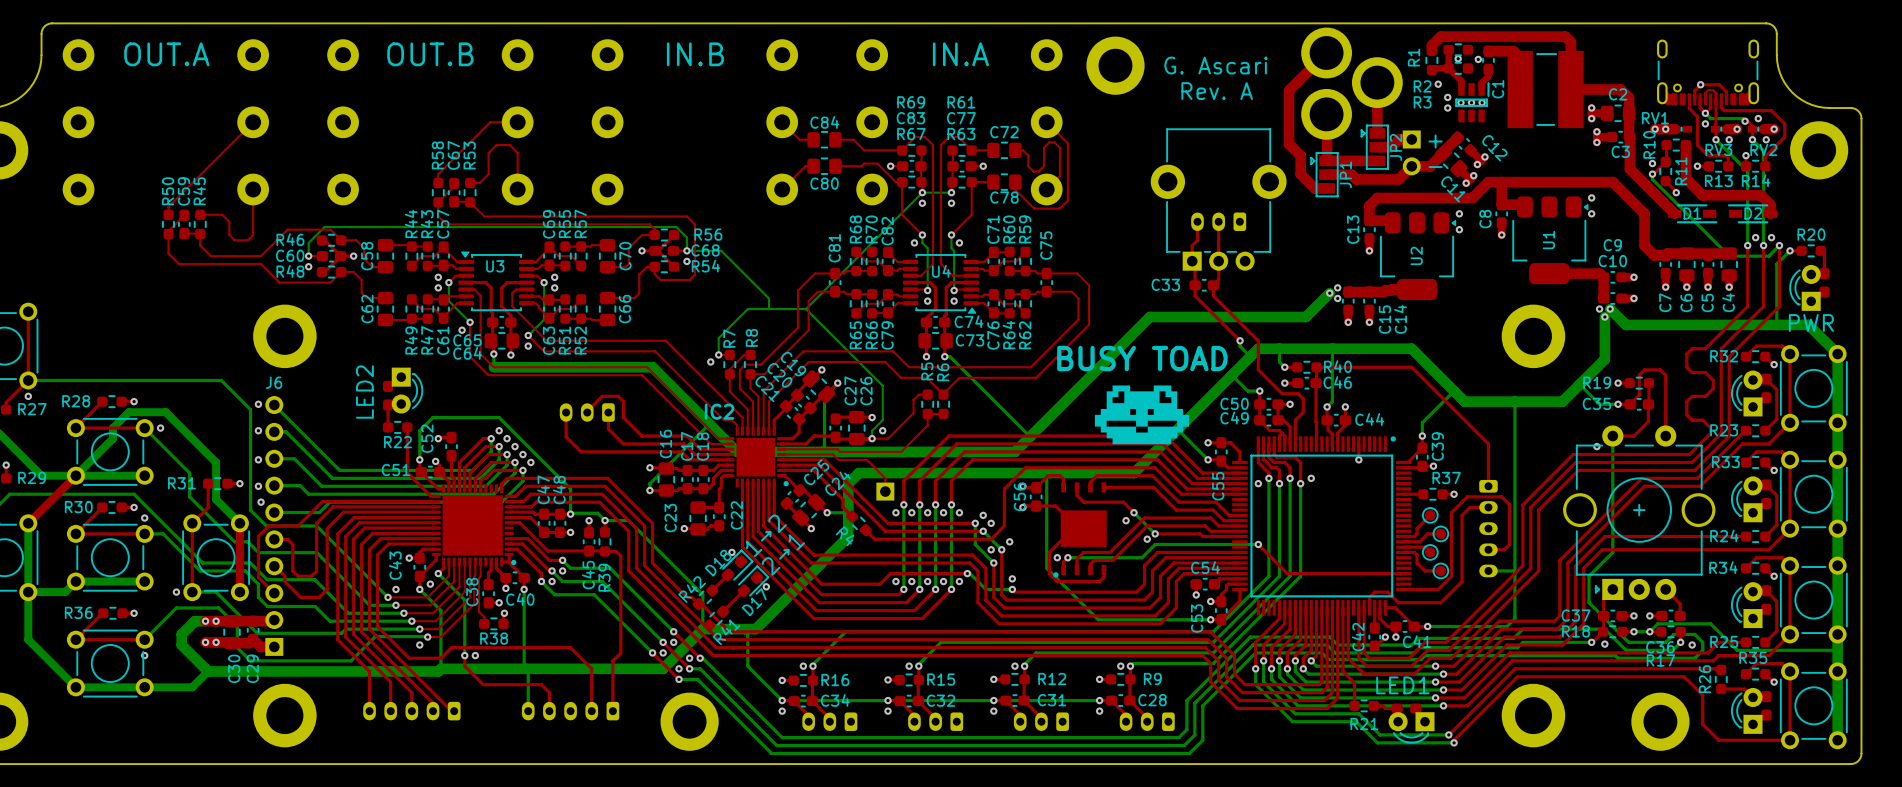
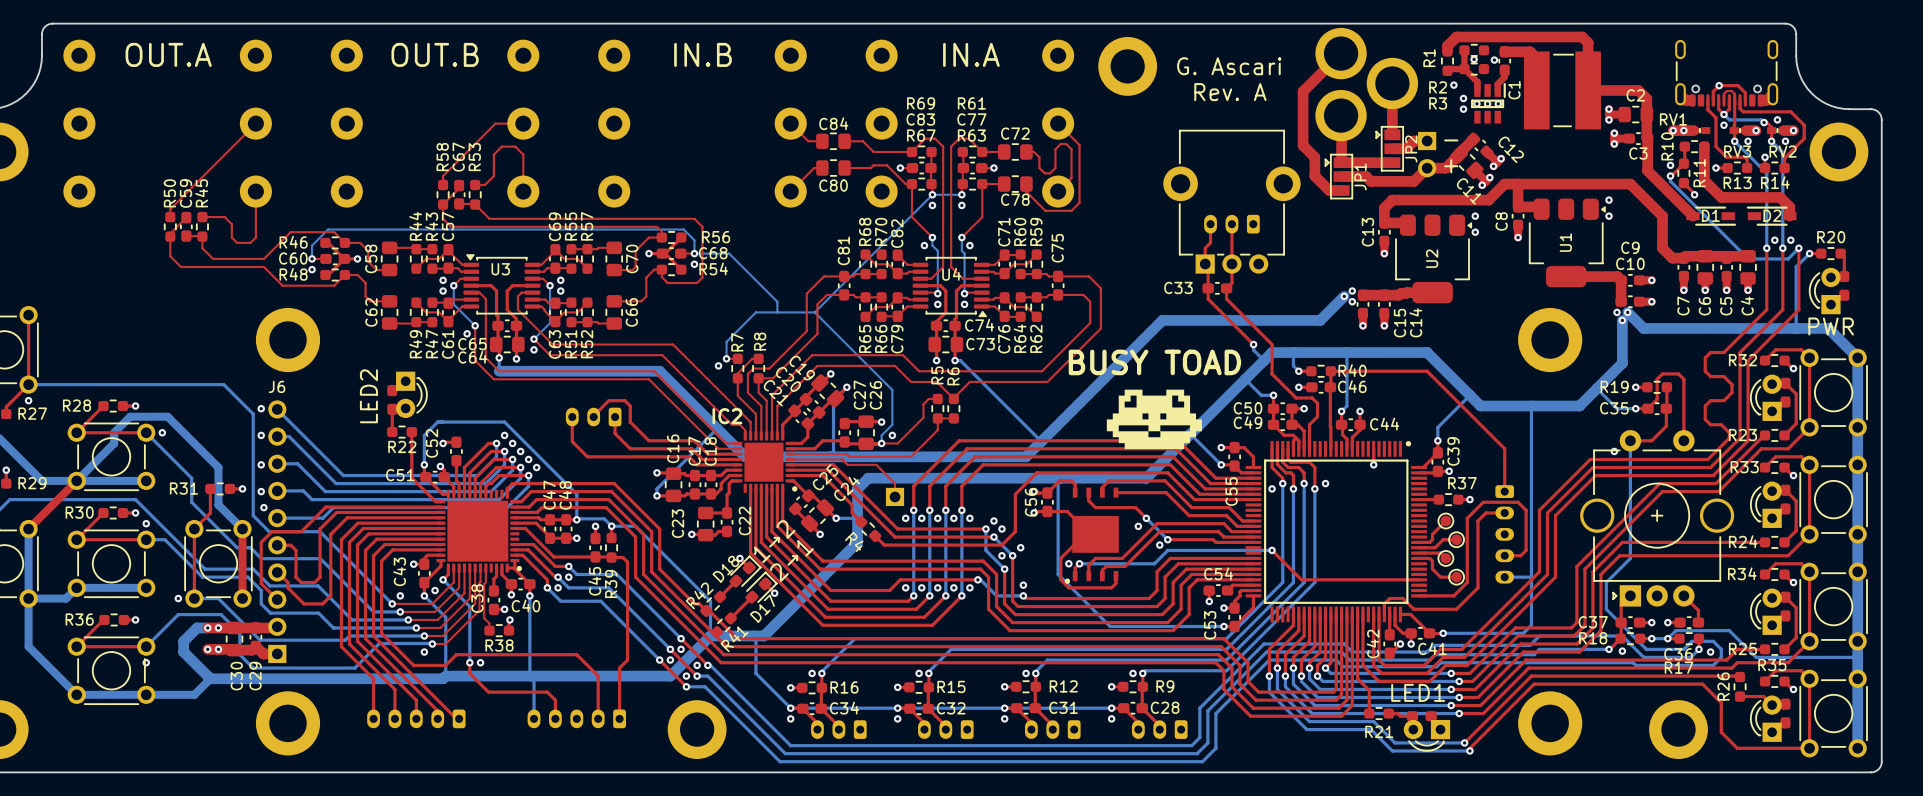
text: + (1435, 141) -> - (1451, 140)
text: - (1435, 167) -> + (1451, 166)

